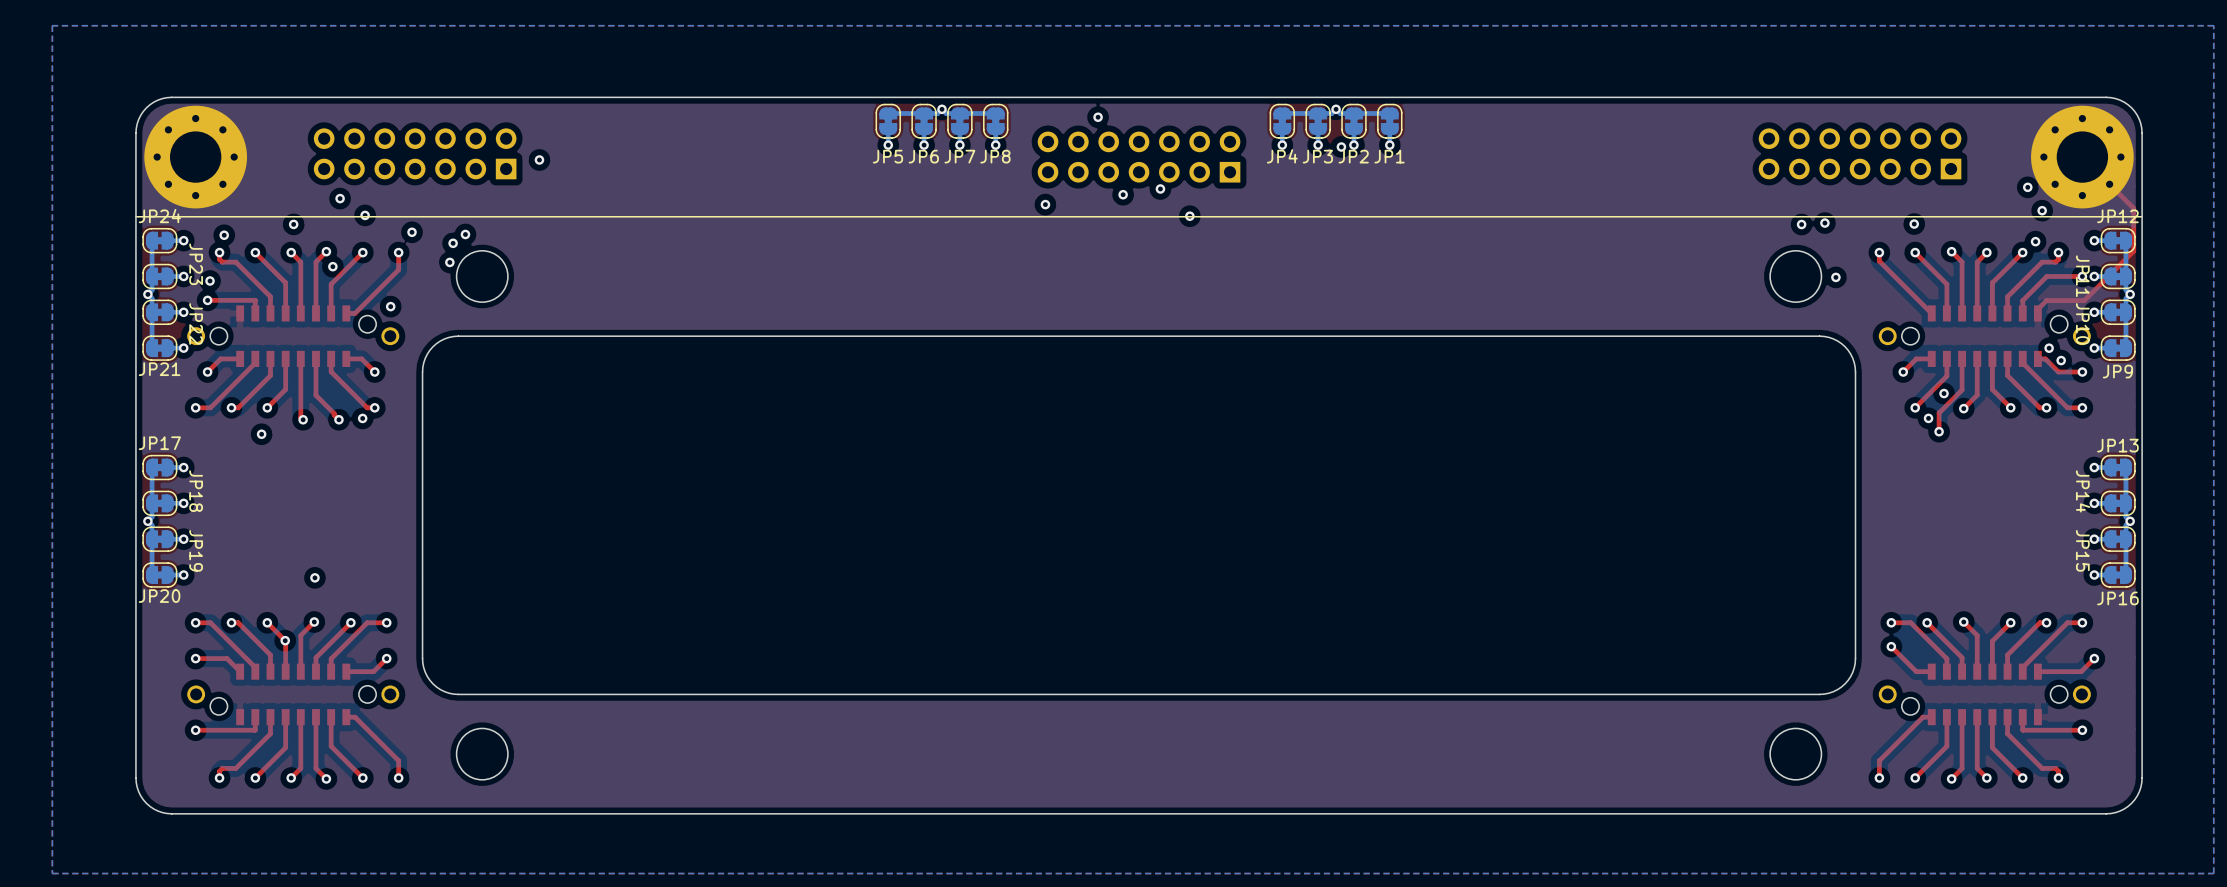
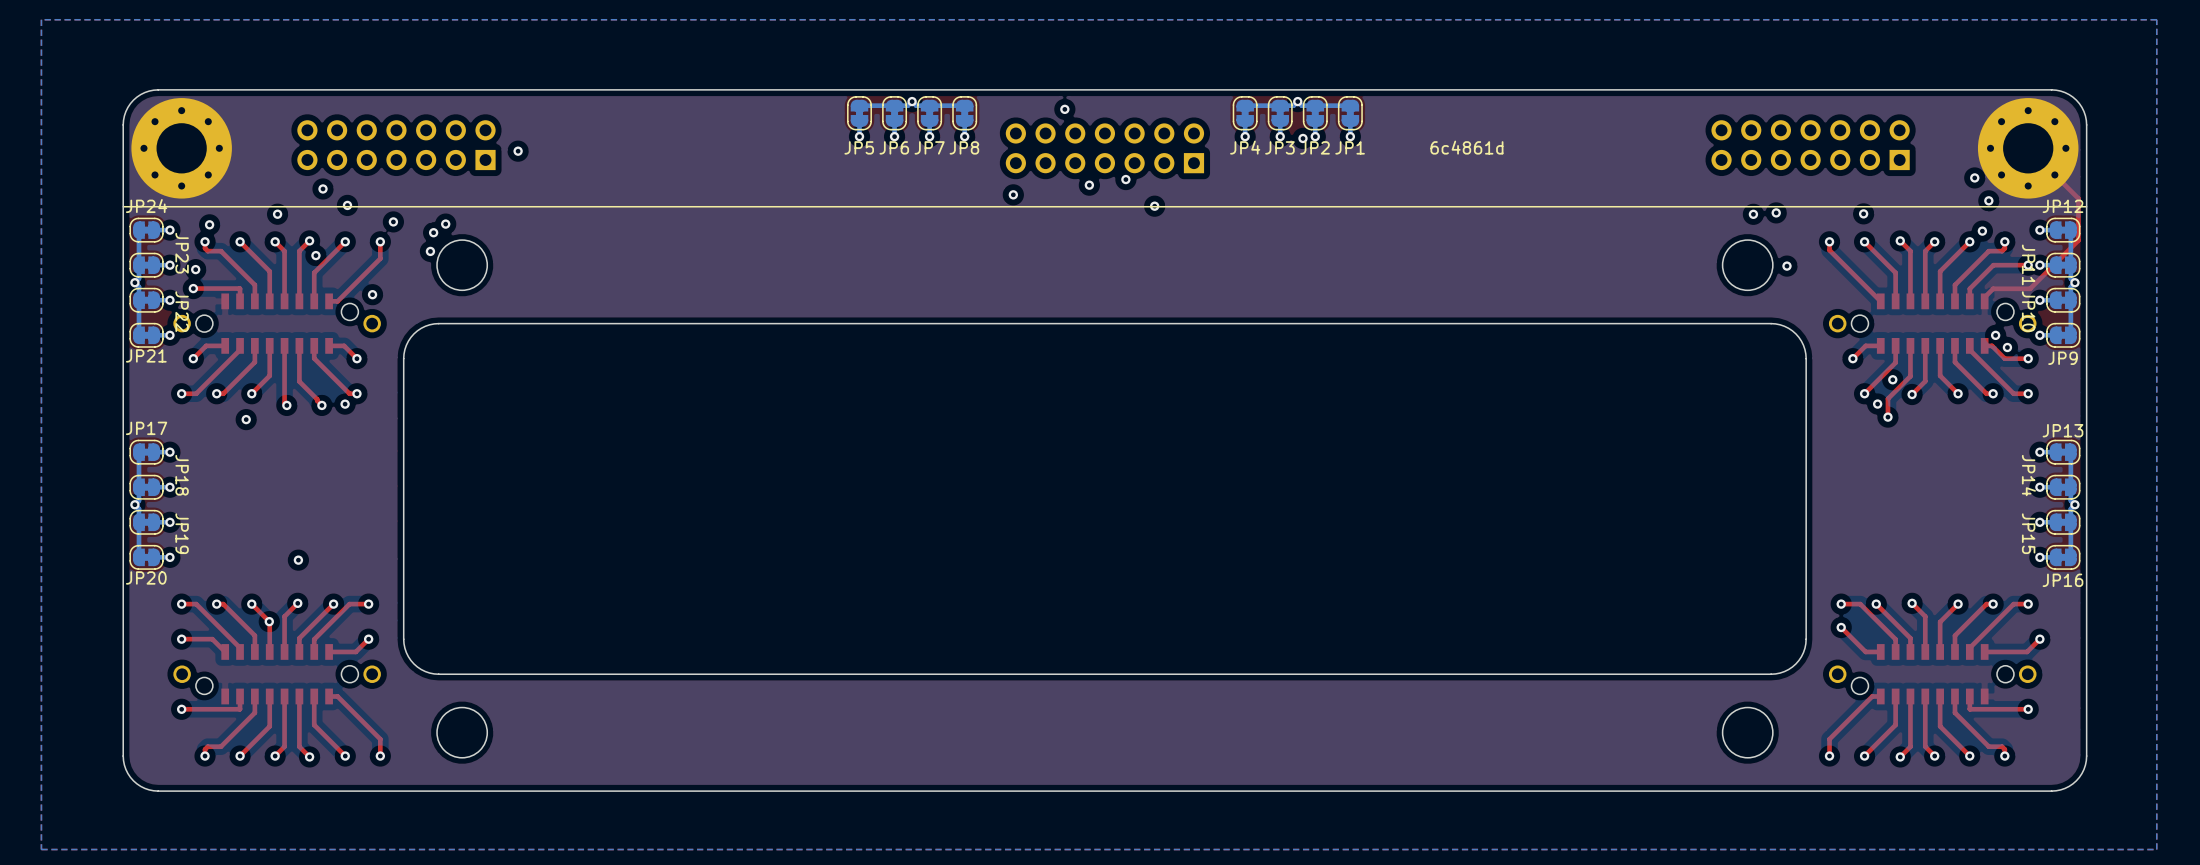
text: none -> 6c4861d (1466, 147)

